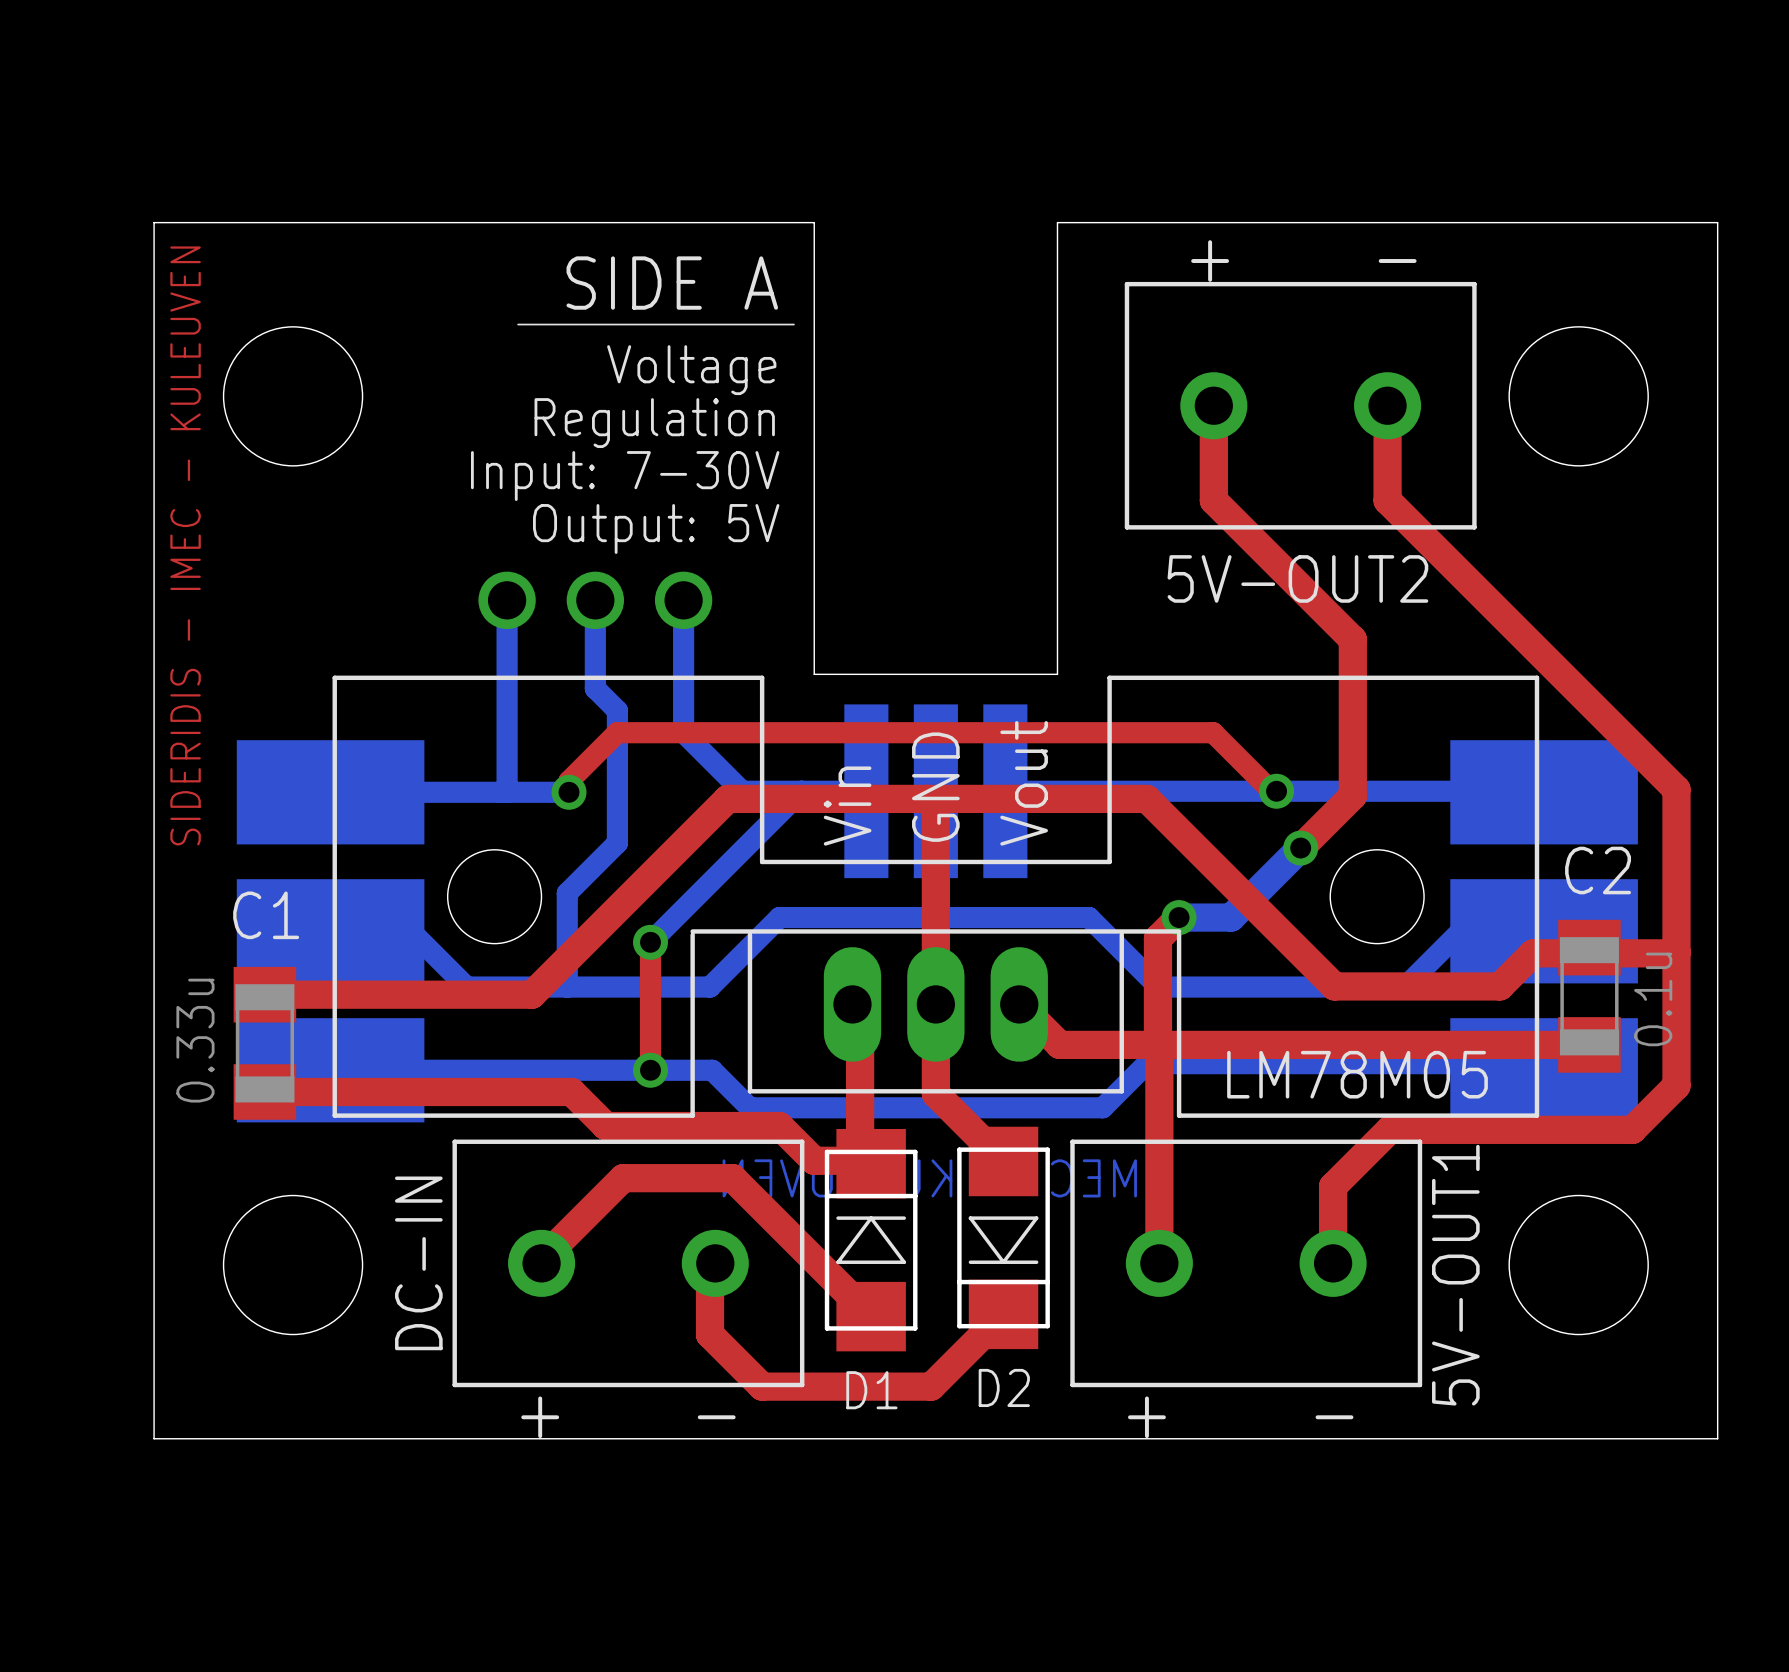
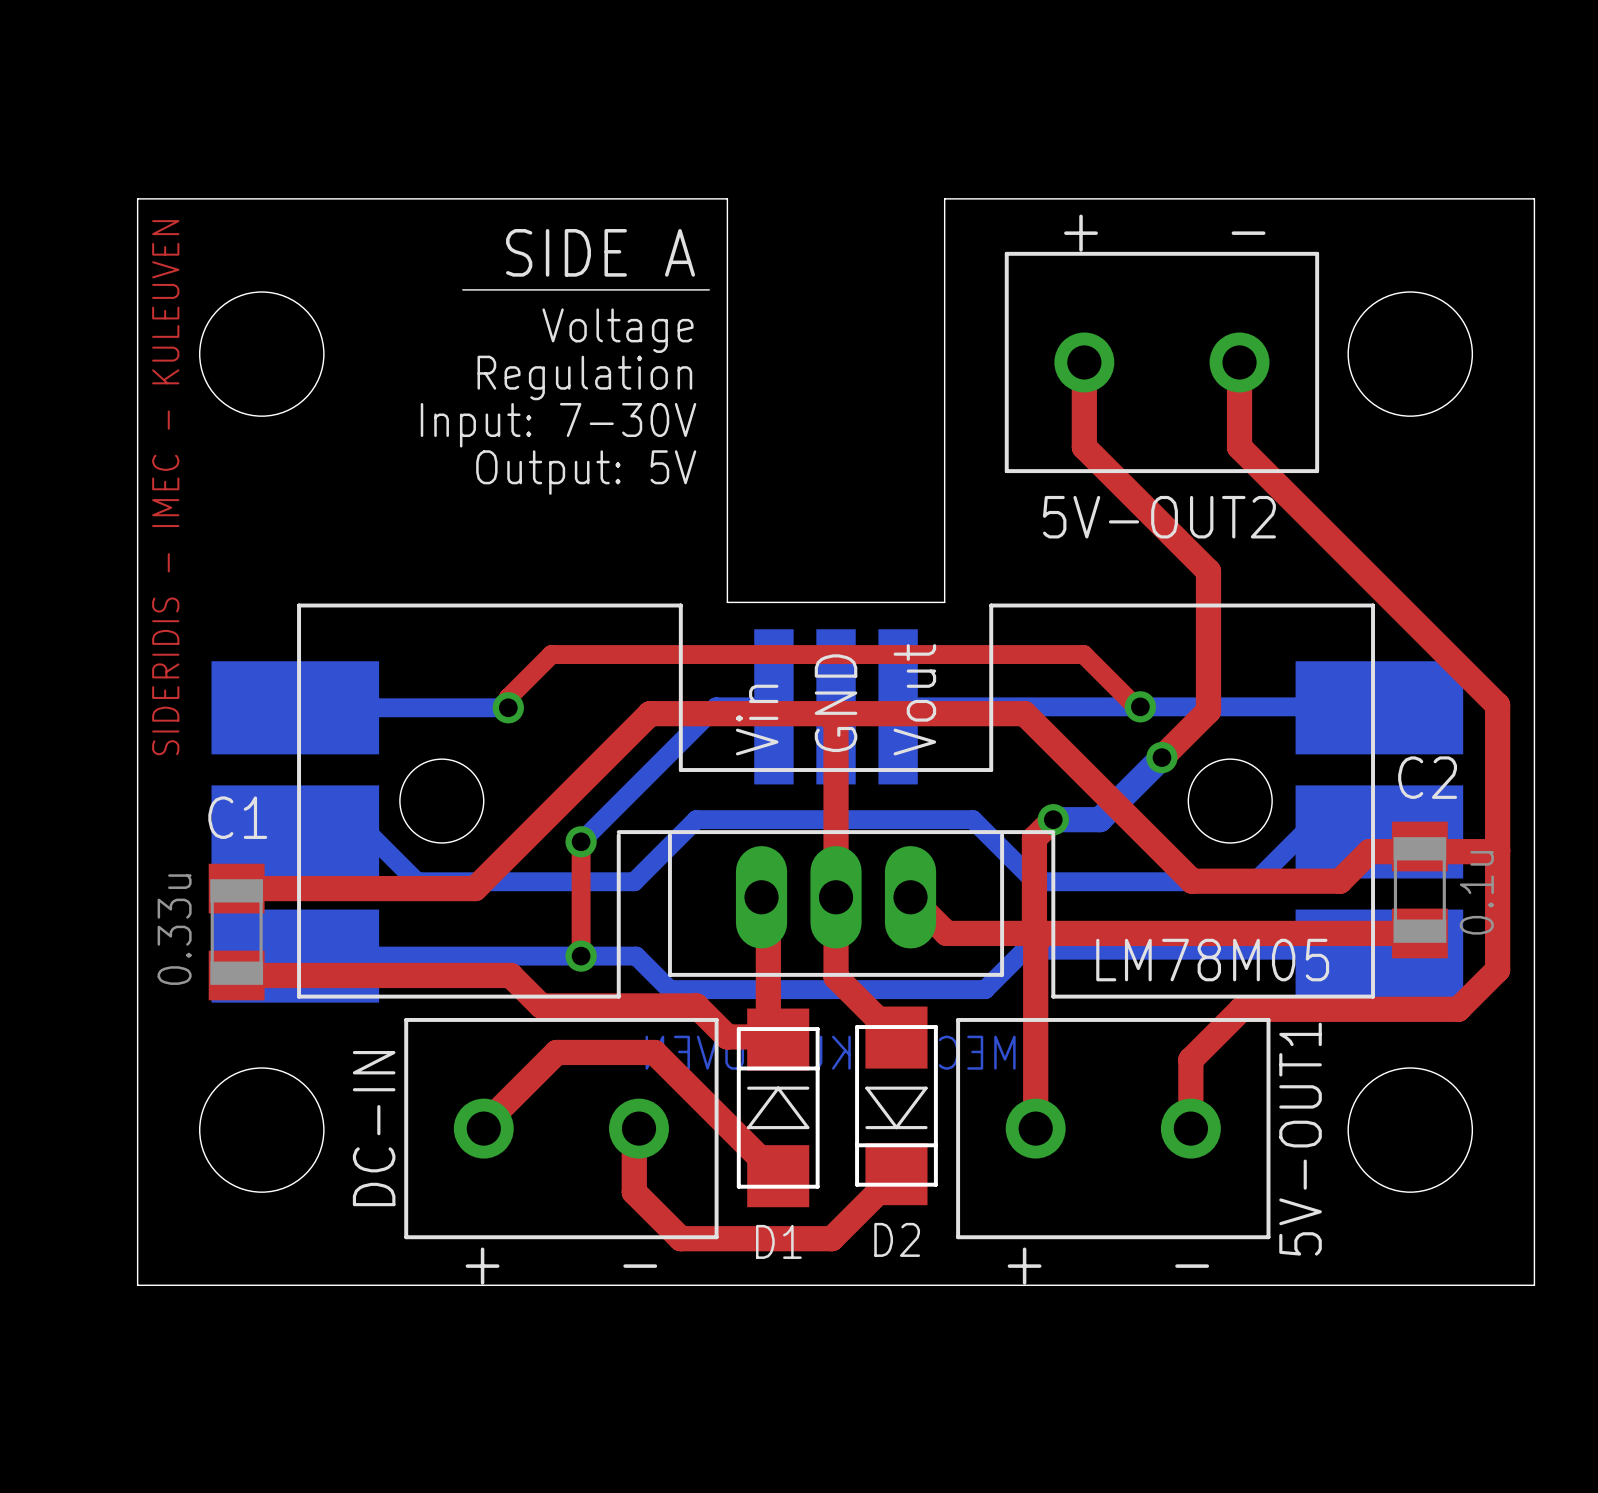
bottom track: (507, 600) (507, 792) -> none
via: (507, 600) -> none
bottom track: (595, 600) (595, 688) (617, 710) (617, 843) (567, 893) (567, 987) -> none
via: (595, 600) -> none
bottom track: (683, 600) (683, 732) (742, 791) (801, 791) -> none
via: (683, 600) -> none

